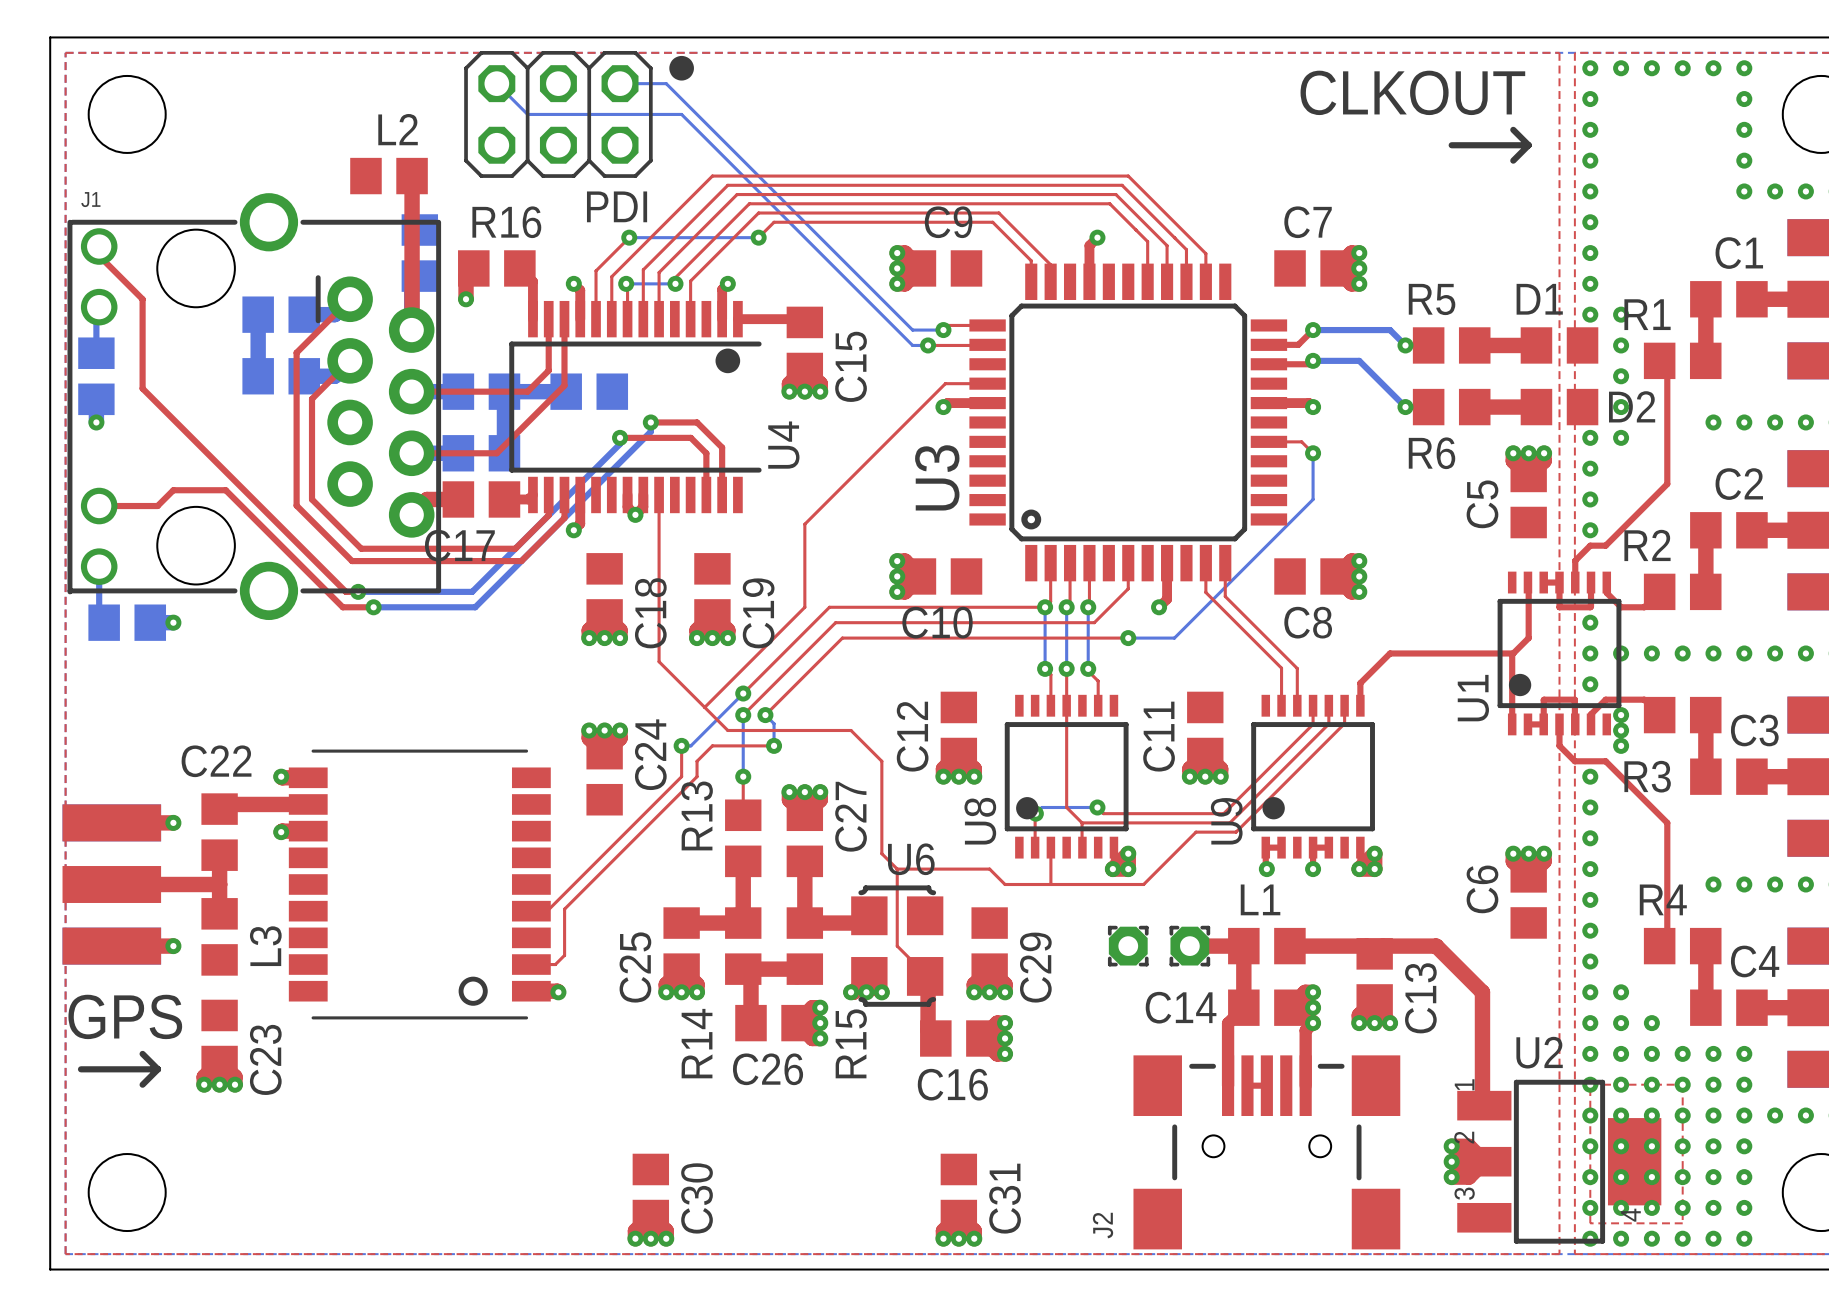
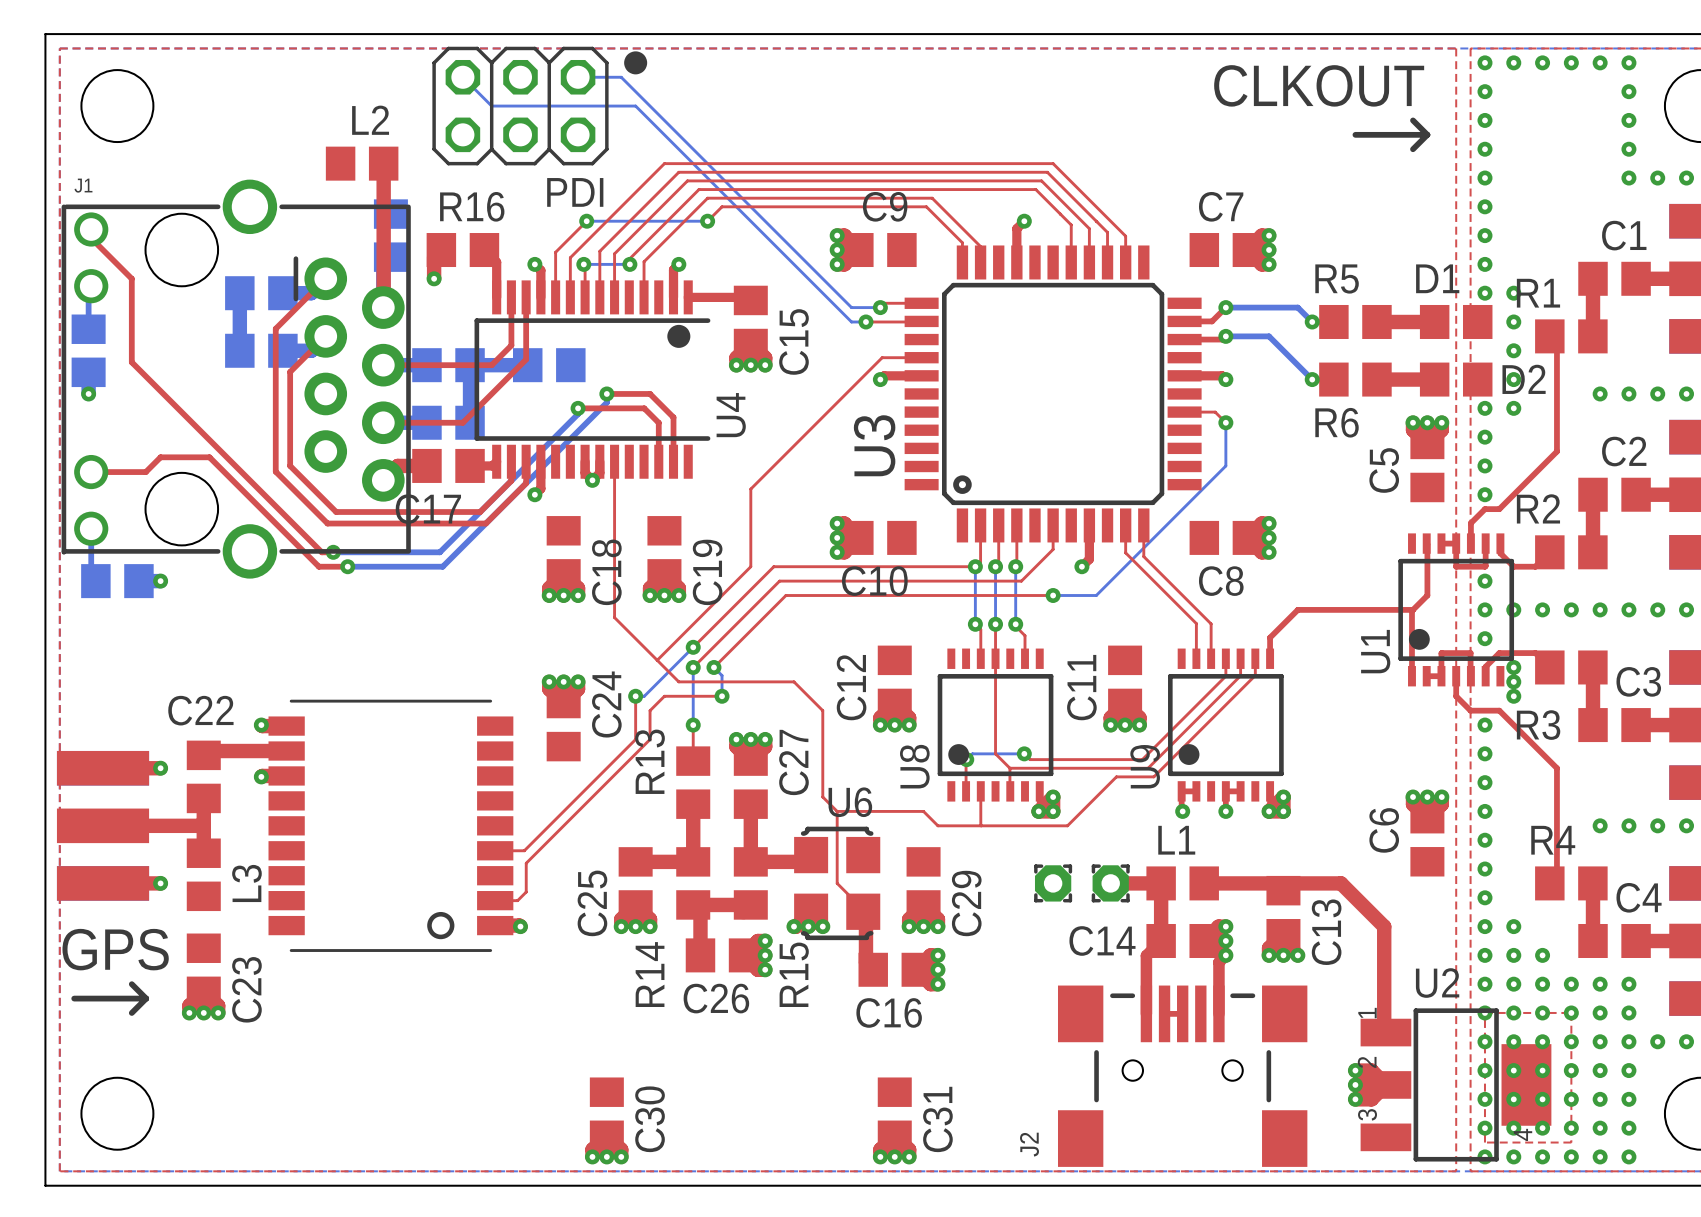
top track: (681, 776) (547, 911) -> none
top track: (697, 776) (681, 792) -> (635, 725) (635, 739)
top track: none -> (650, 725) (650, 739) (526, 863)
top track: (564, 909) (564, 924) -> (526, 848) (524, 850) (509, 850)

